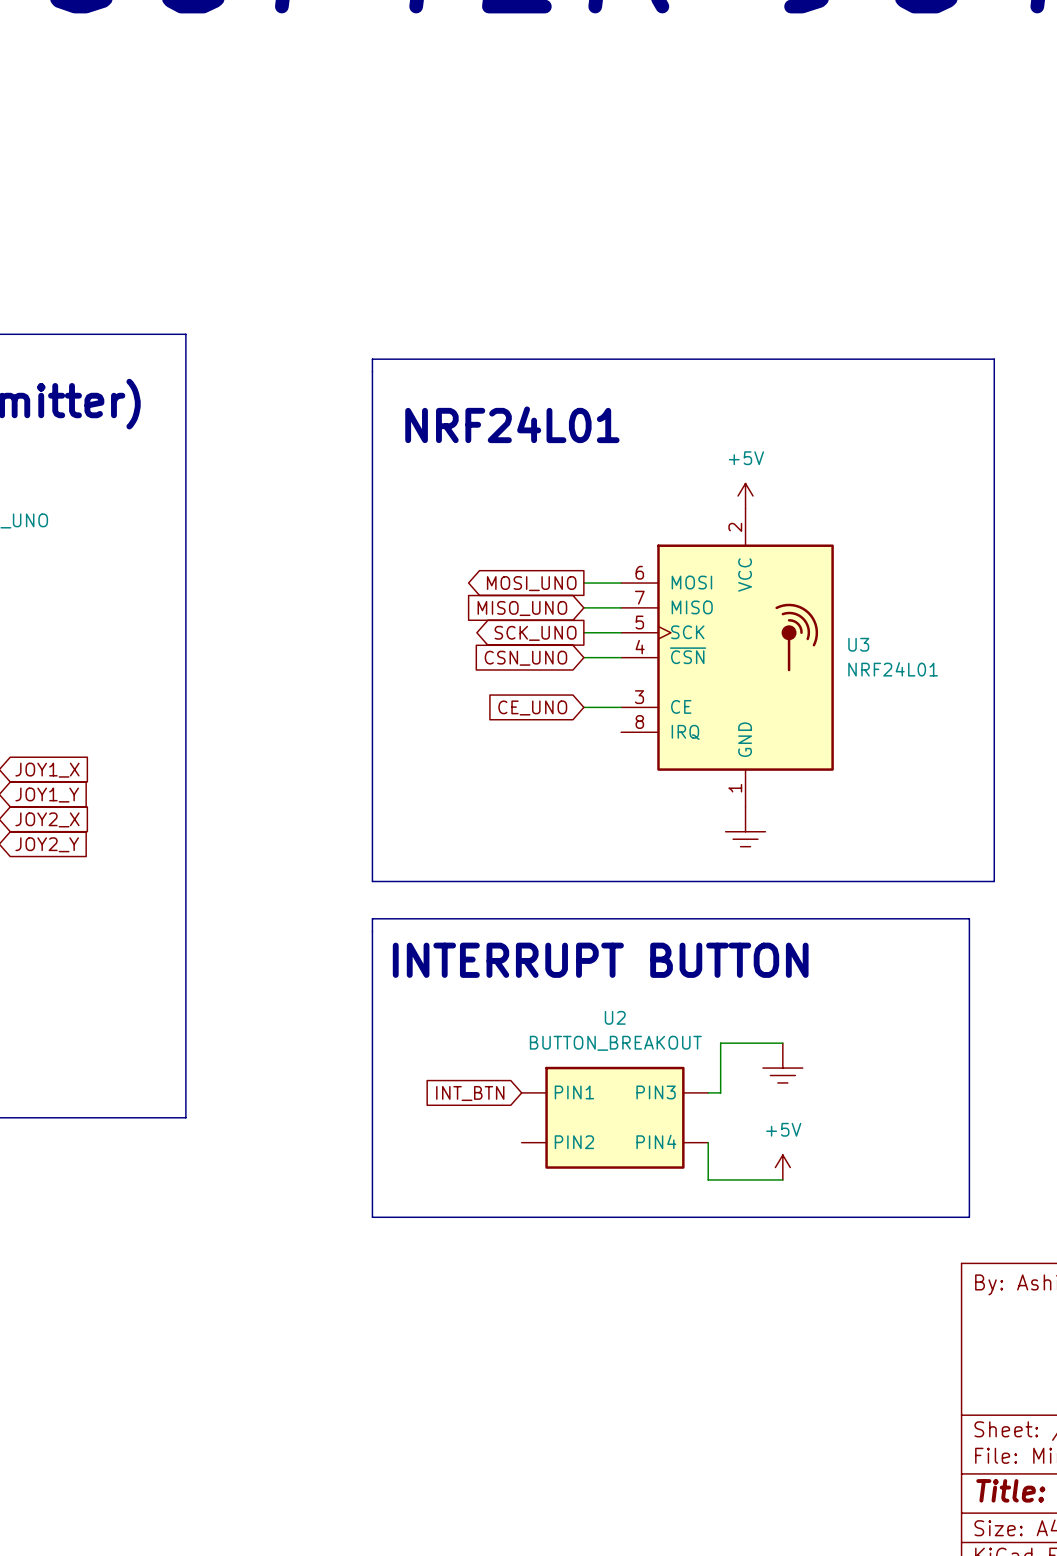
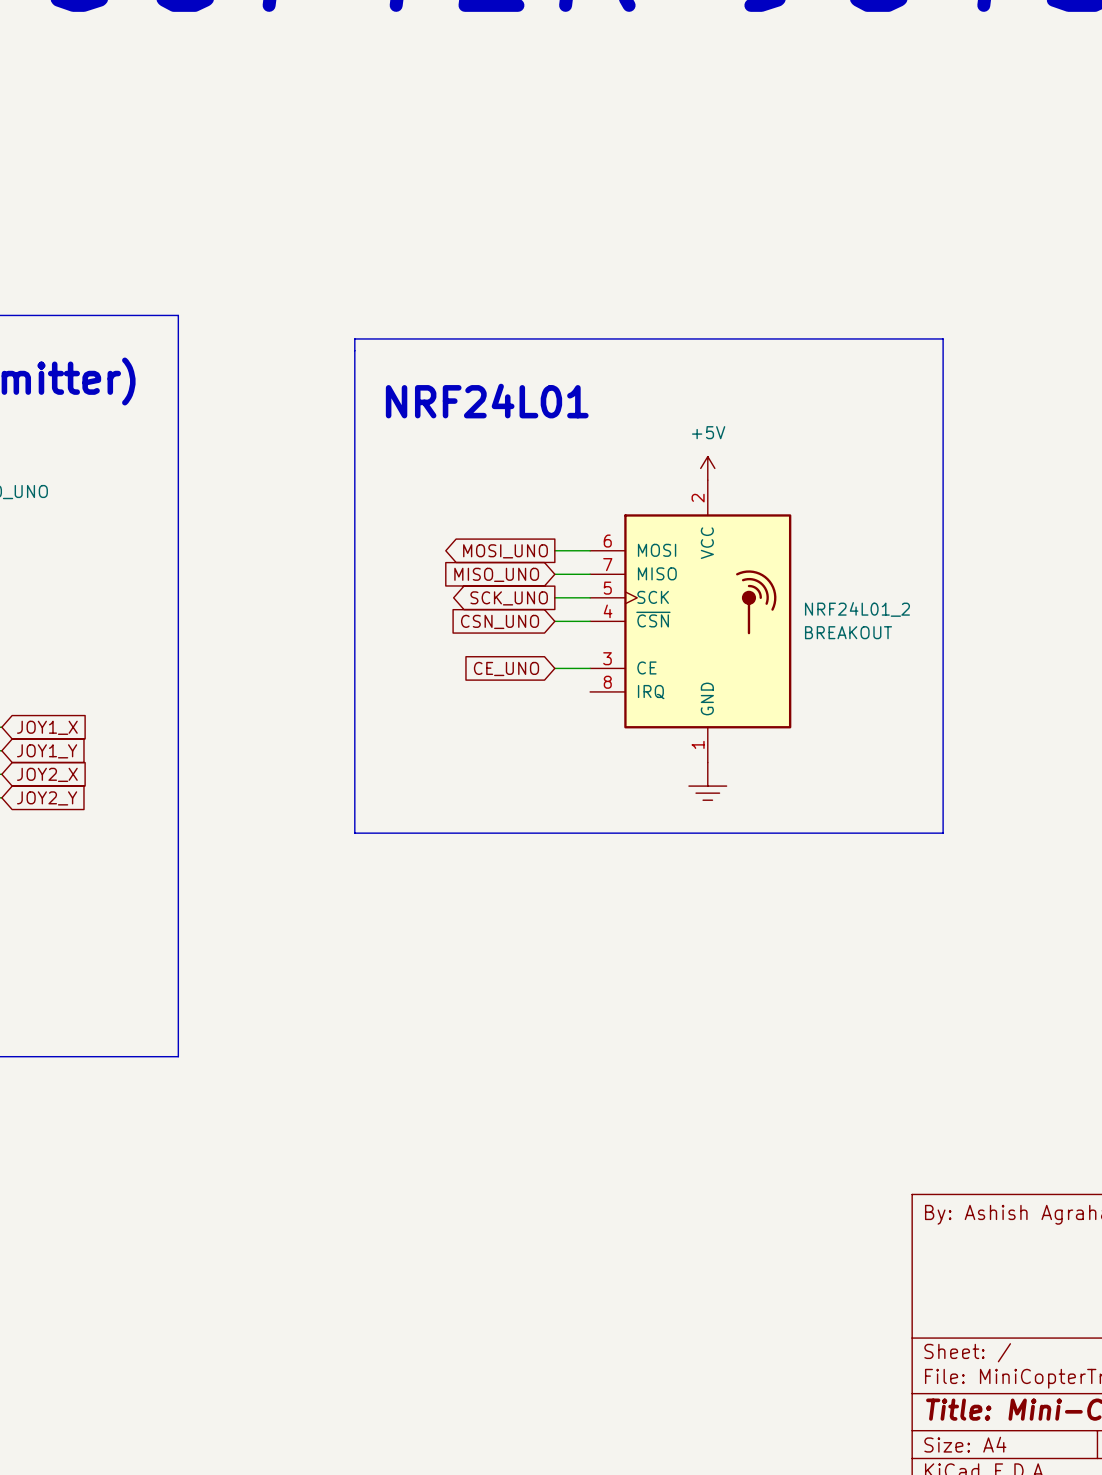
U3 name: U3 (858, 644) -> NRF24L01_2 (857, 609)
U3 value: NRF24L01 (893, 669) -> BREAKOUT (848, 632)
line: (372, 918) (372, 1217) (969, 1217) (969, 918) (372, 918) -> none
text: INTERRUPT BUTTON (600, 960) -> none
wire: (782, 1043) (720, 1043) (720, 1092) (708, 1092) -> none
power symbol: (782, 1063) -> none
global label: INT_BTN (470, 1093) -> none
U2: BUTTON_BREAKOUT (614, 1117) -> none
wire: (708, 1142) (708, 1179) (782, 1179) -> none
power symbol: +5V (782, 1167) -> none

